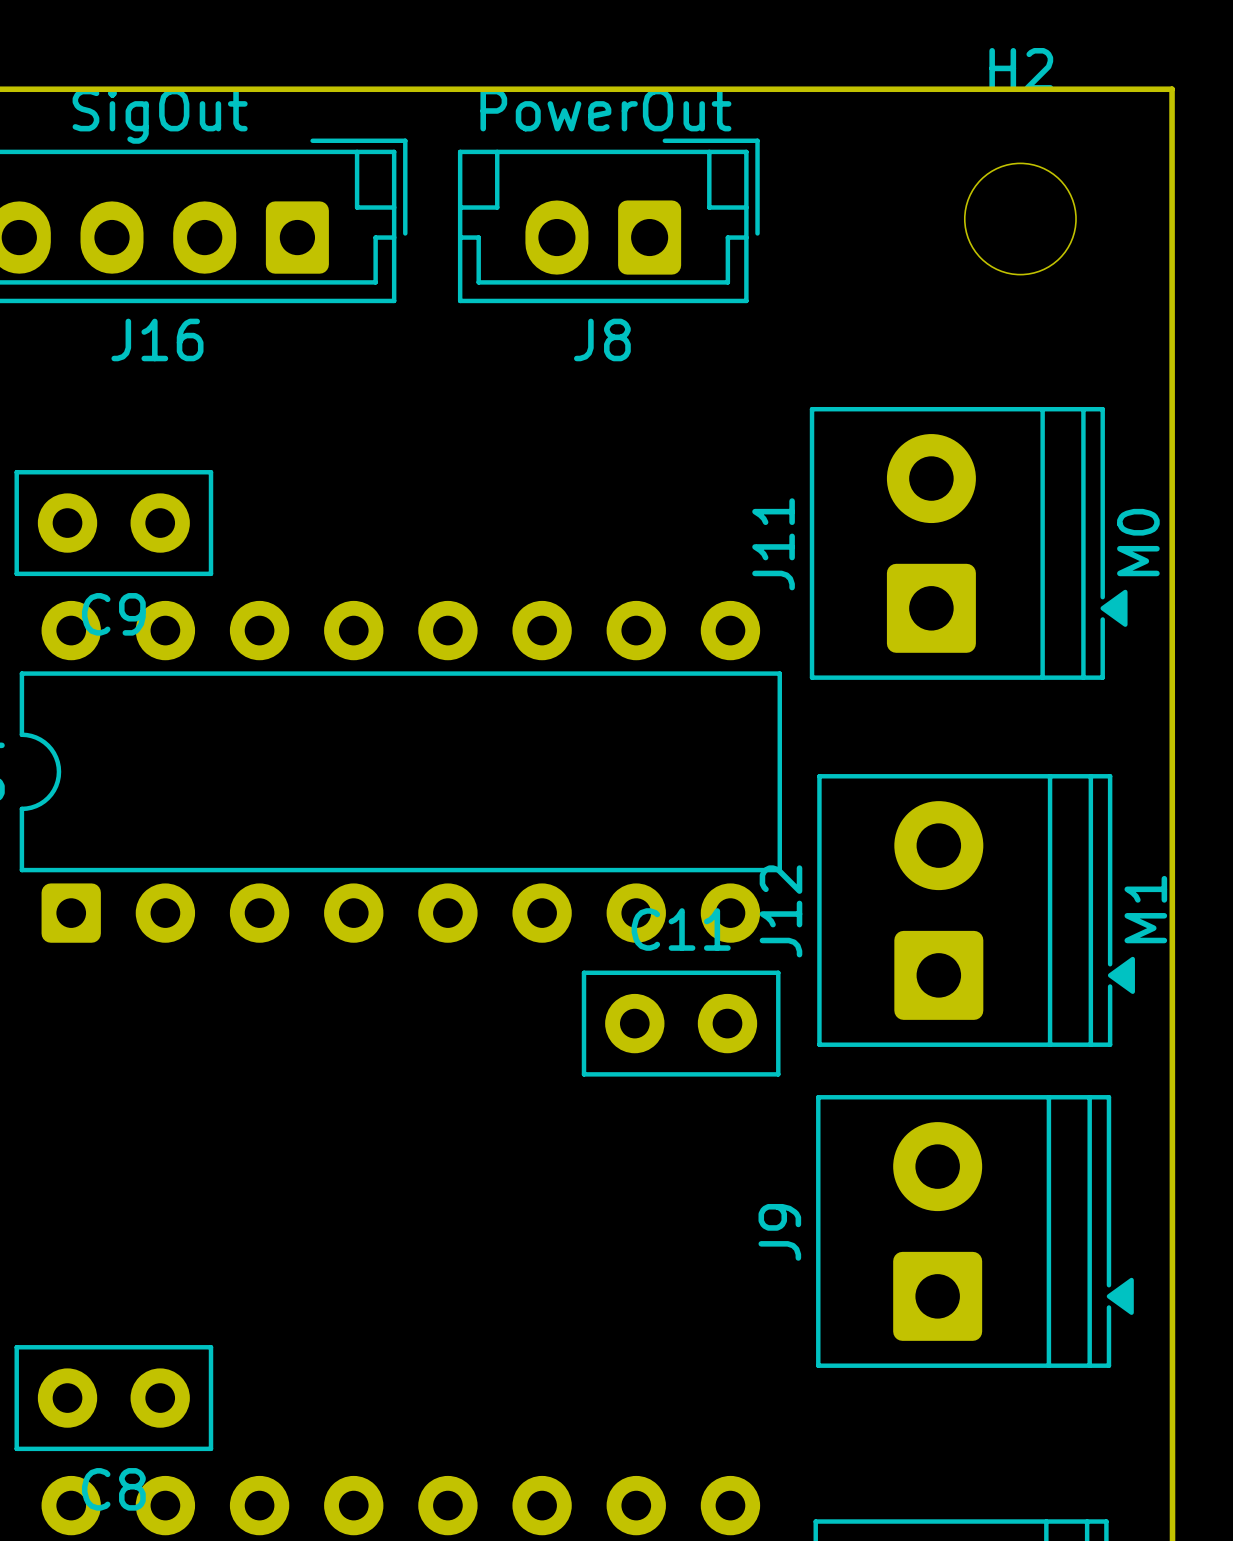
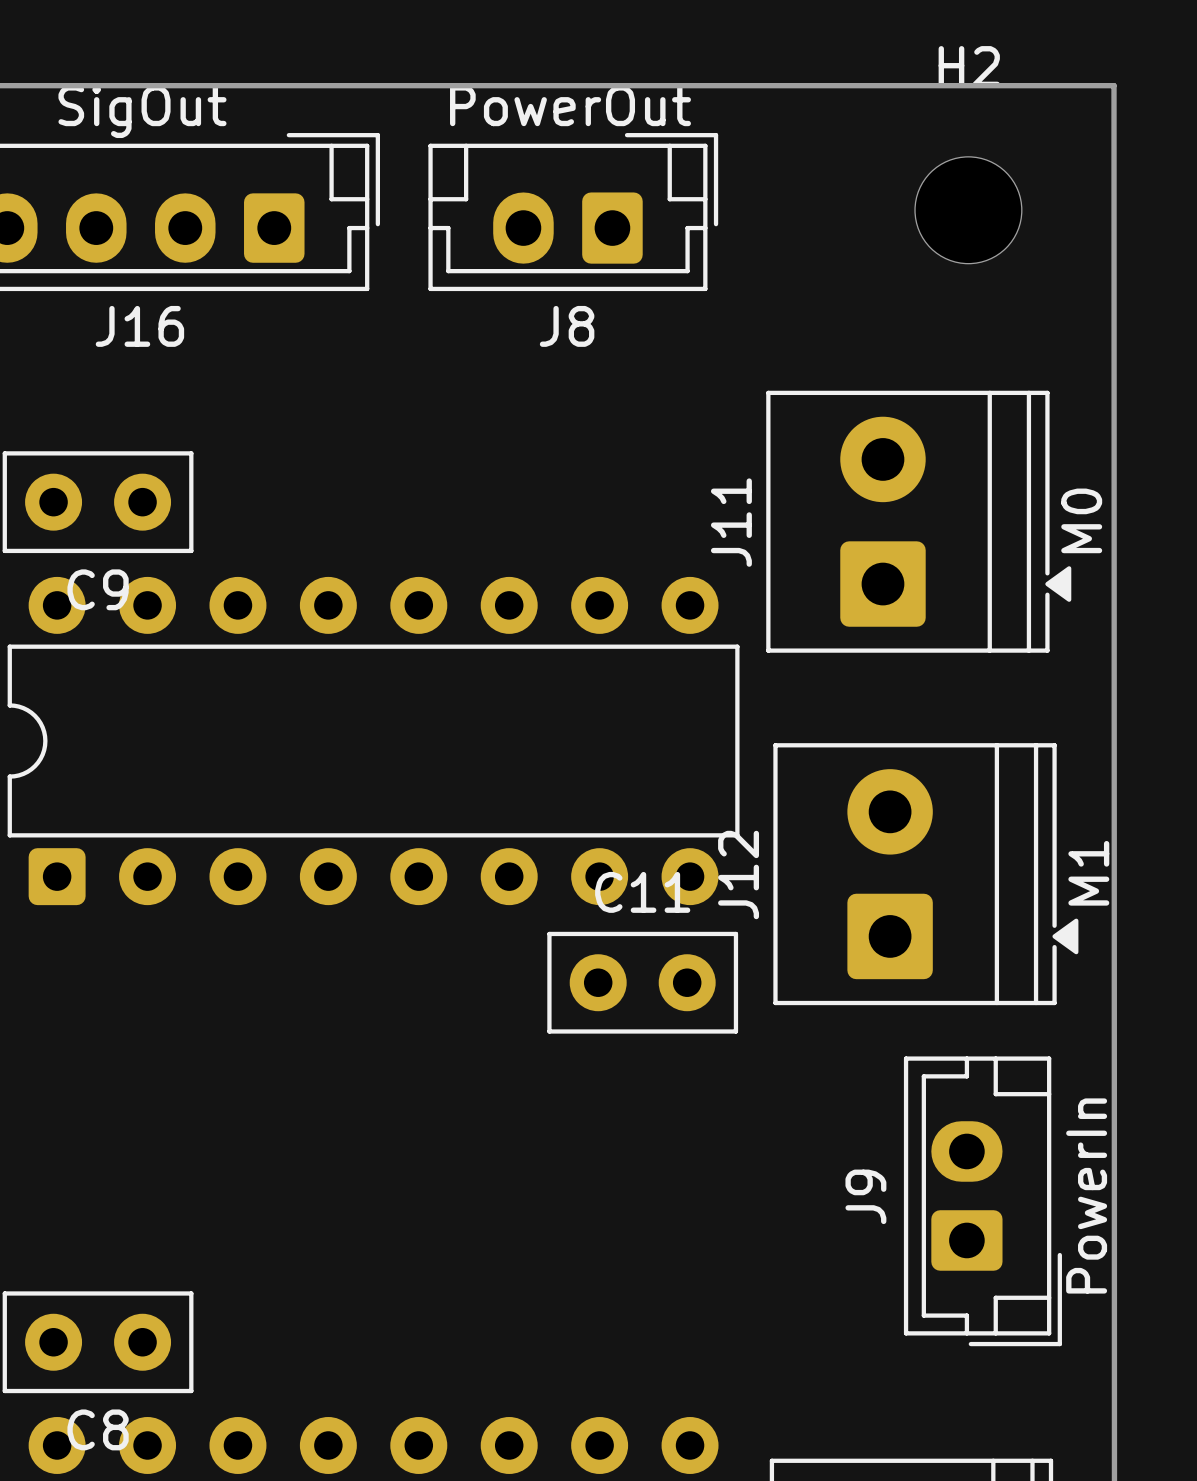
J9 footprint: [816, 1095, 1134, 1368] -> [903, 1056, 1062, 1347]
J9 value: none -> PowerIn (1086, 1195)

